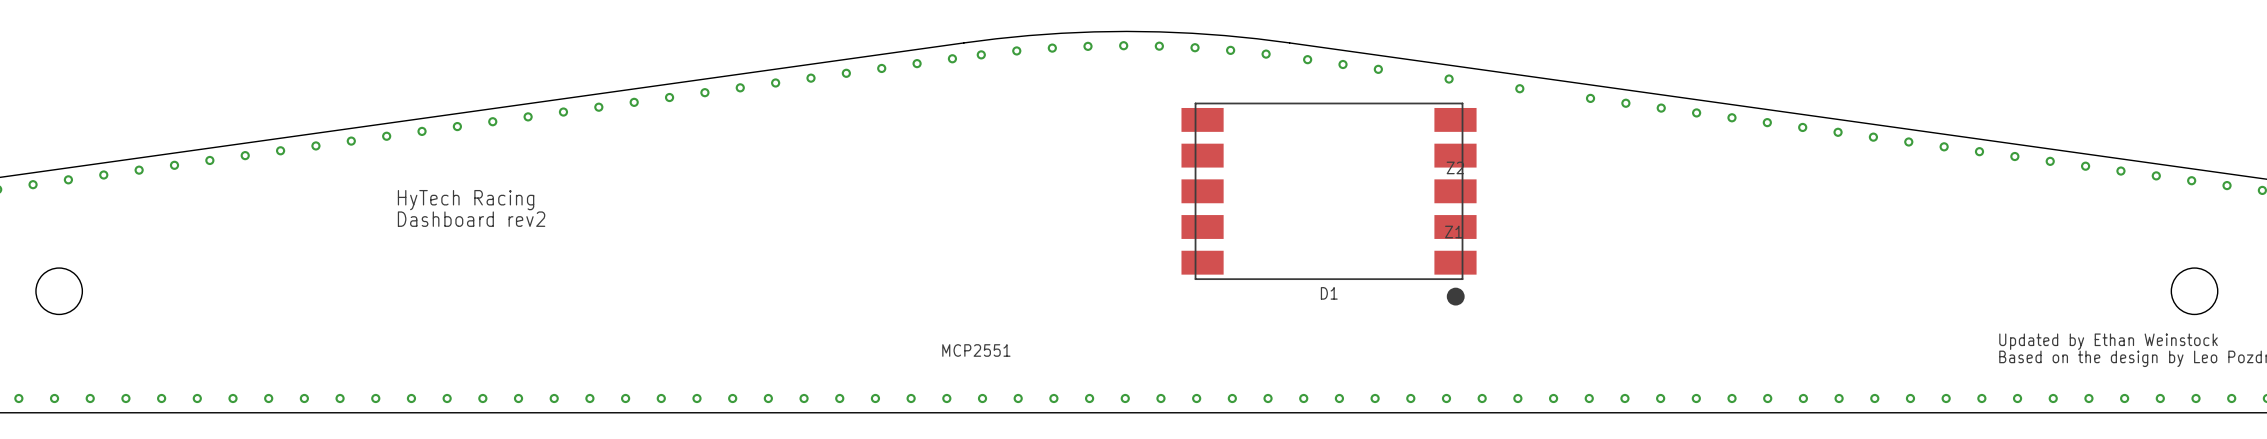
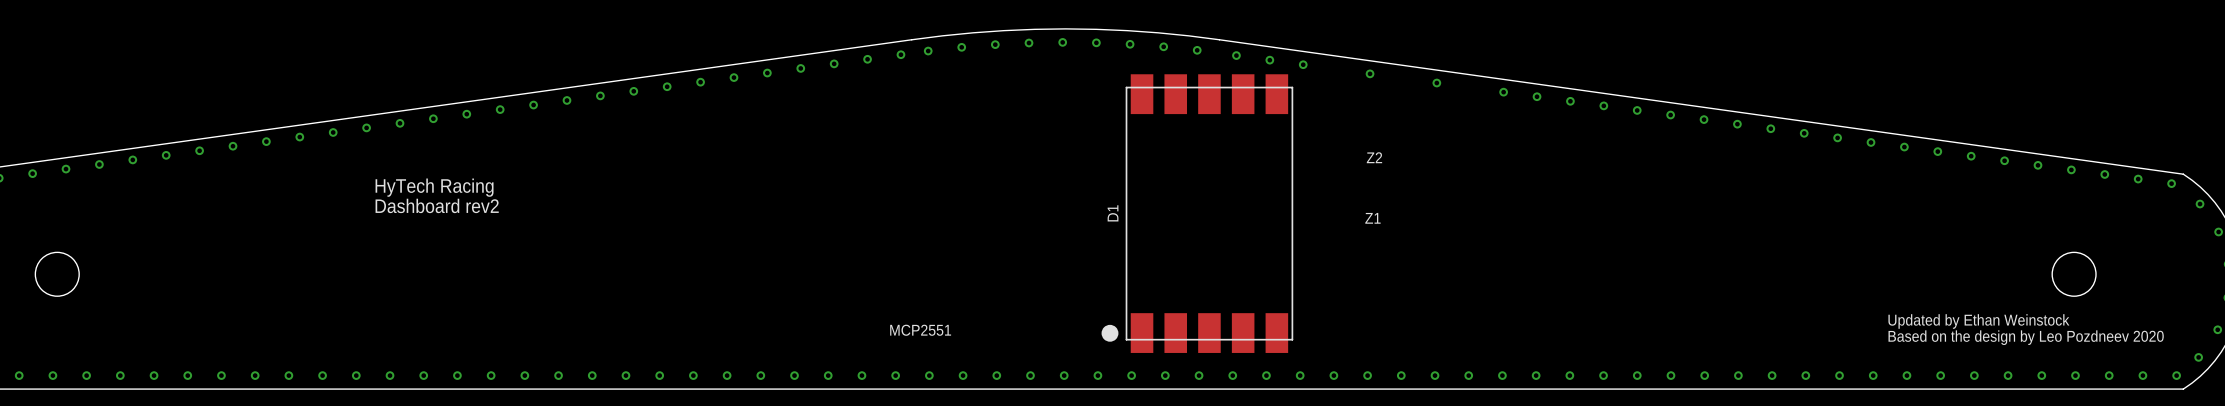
D1 rotation: 0° (1329, 204) -> 90° clockwise (1197, 213)

